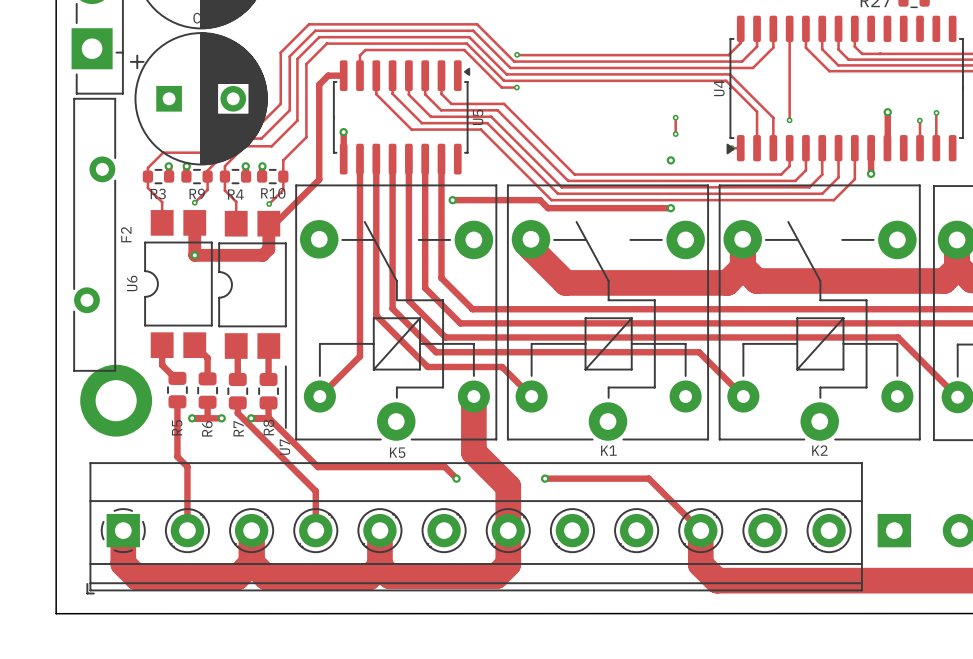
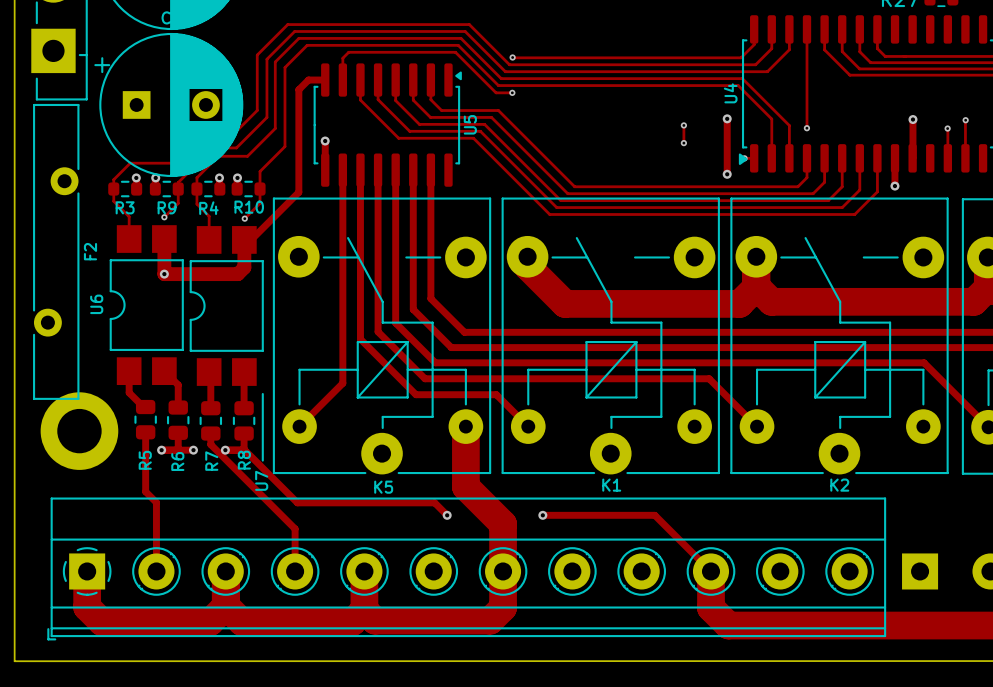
track: none -> (727, 118) (727, 174)
via: none -> (727, 118)
via: (670, 160) -> none
via: none -> (727, 174)
track: (452, 200) (539, 200) (547, 208) (670, 208) -> none
via: (452, 200) -> none
via: (670, 208) -> none

